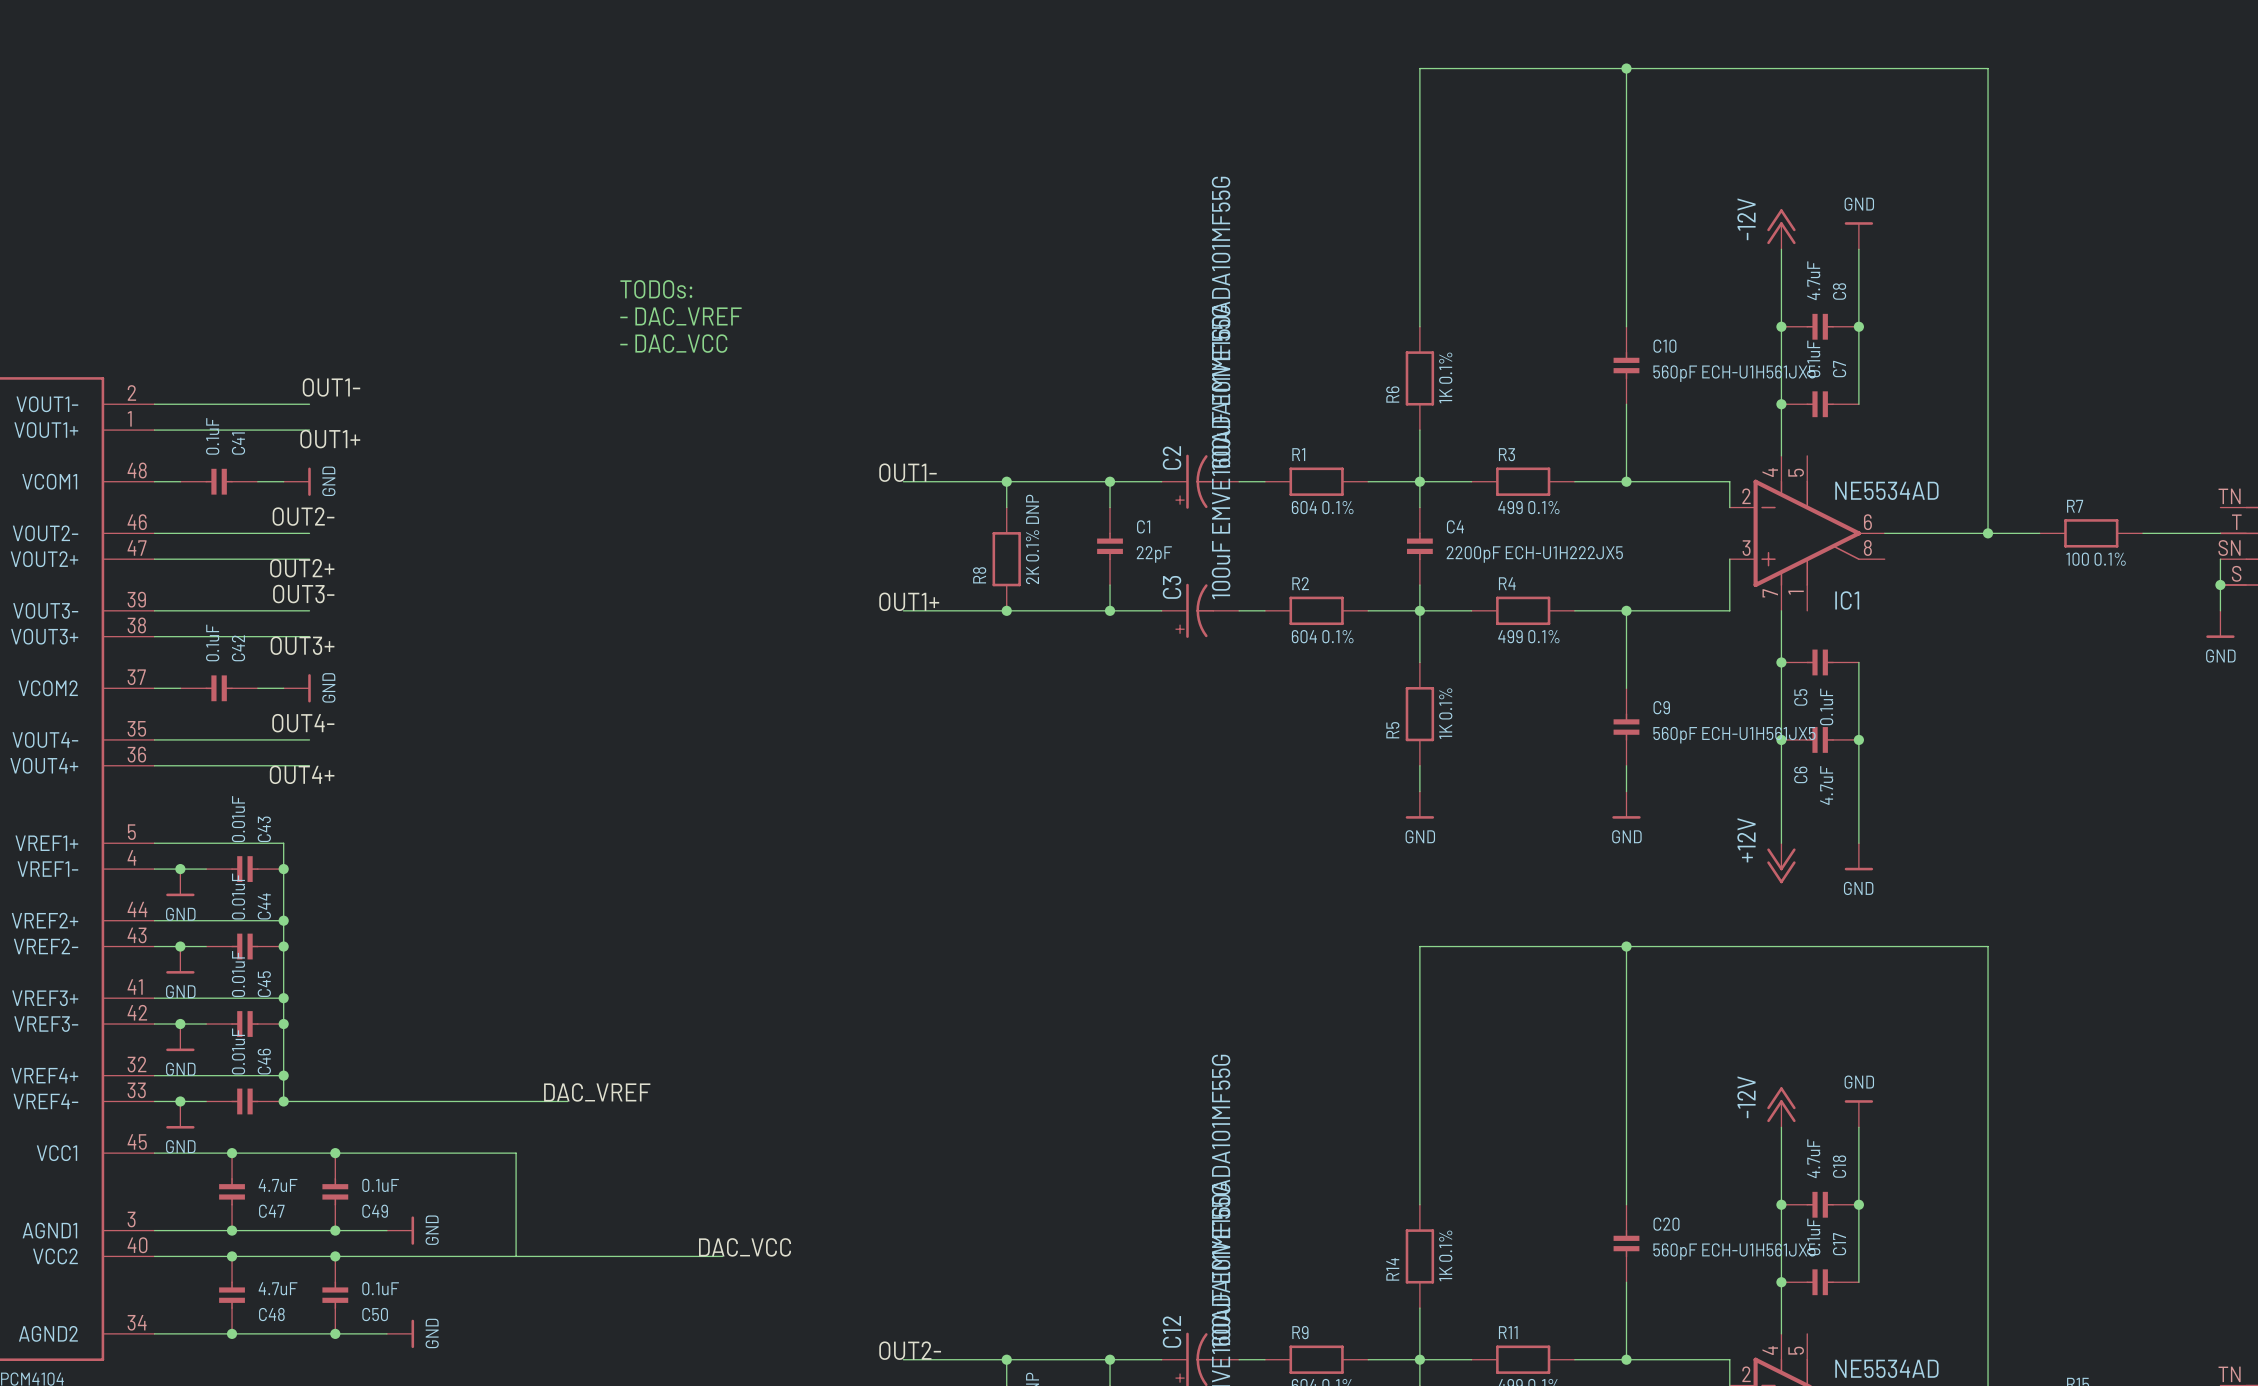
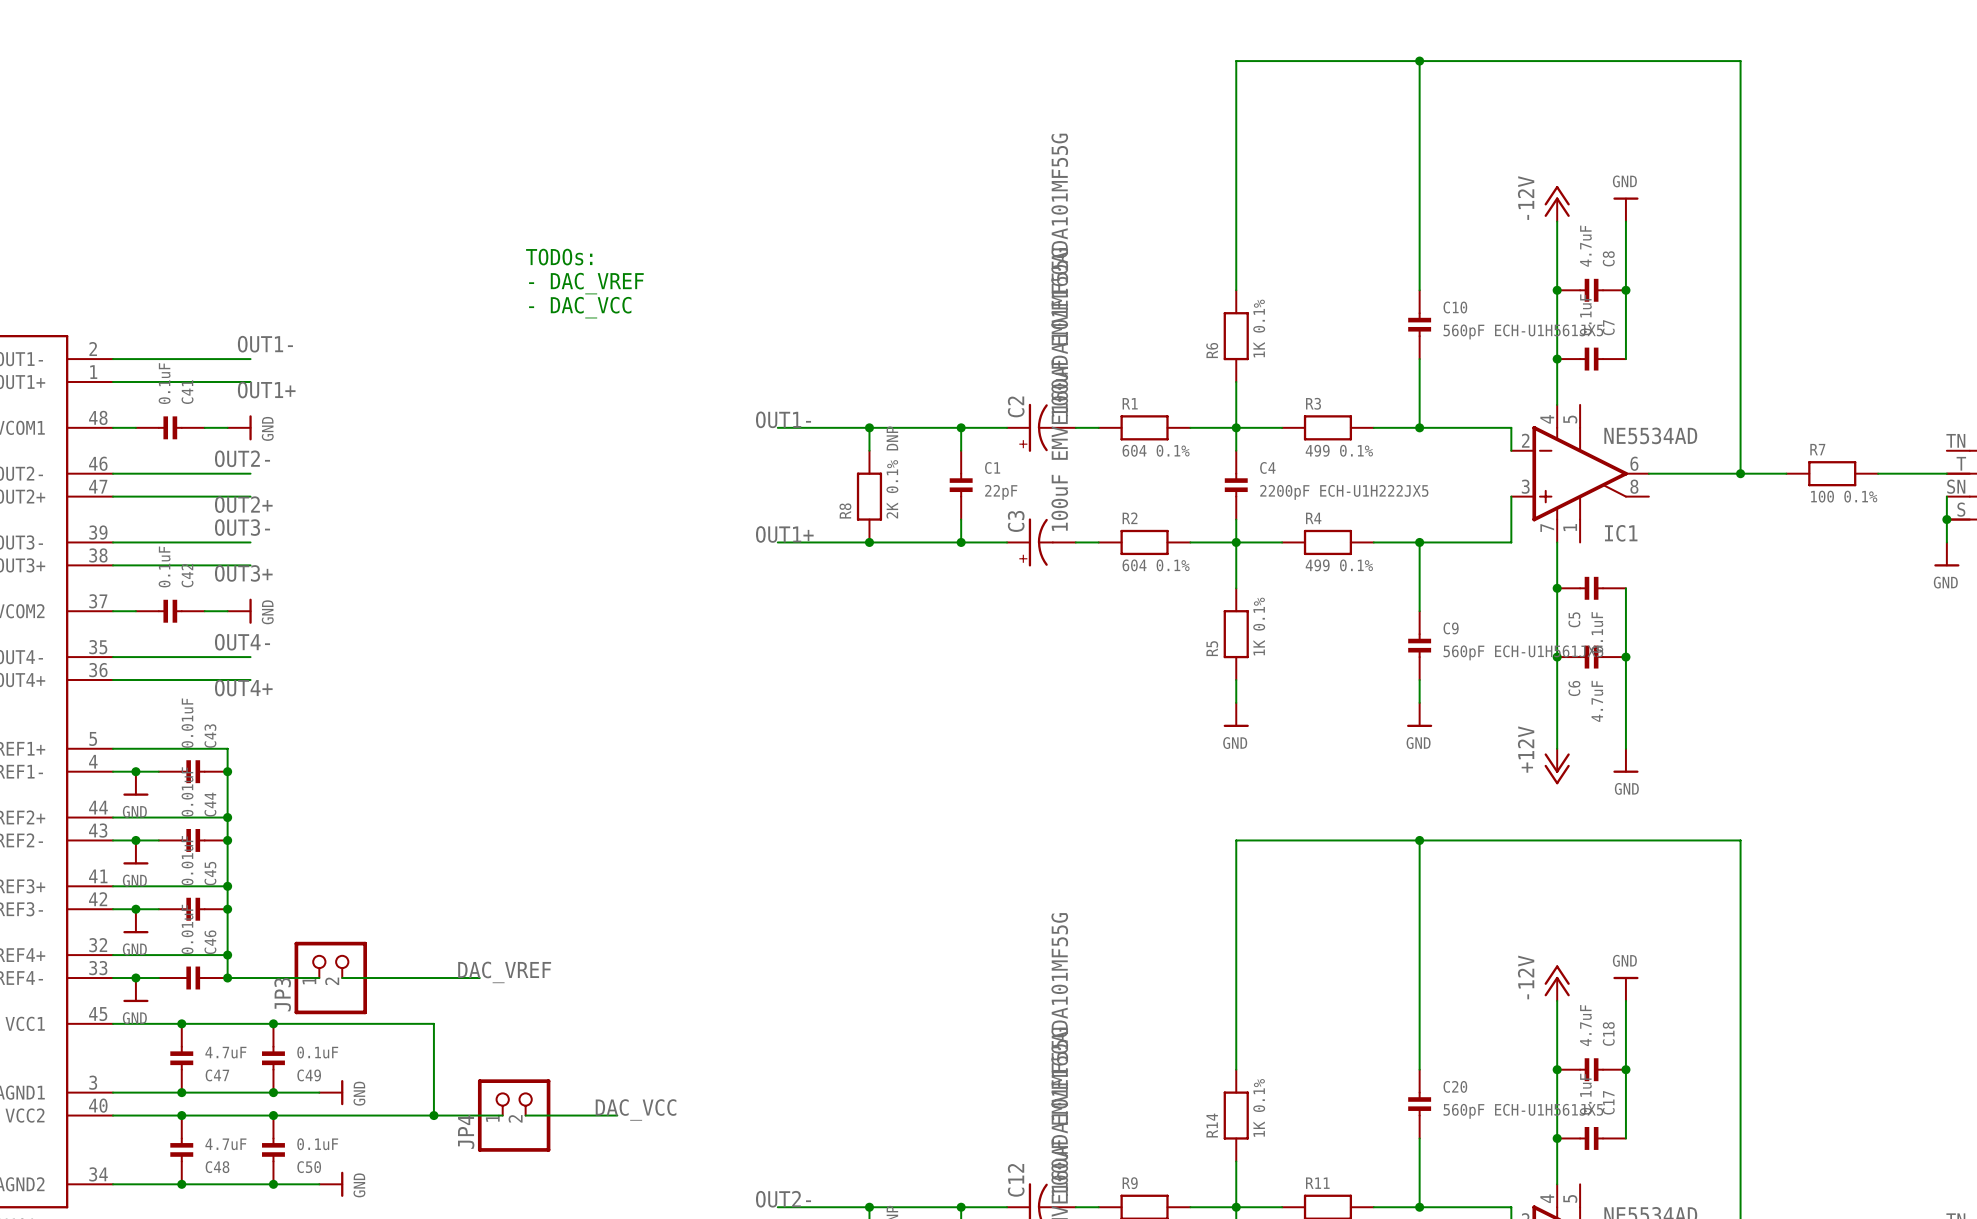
wire: (386, 1101) (412, 1101) -> none
JP3: none -> (330, 978)
junction: none -> (433, 1115)
wire: (593, 1256) (619, 1256) -> none
JP4: none -> (514, 1115)

